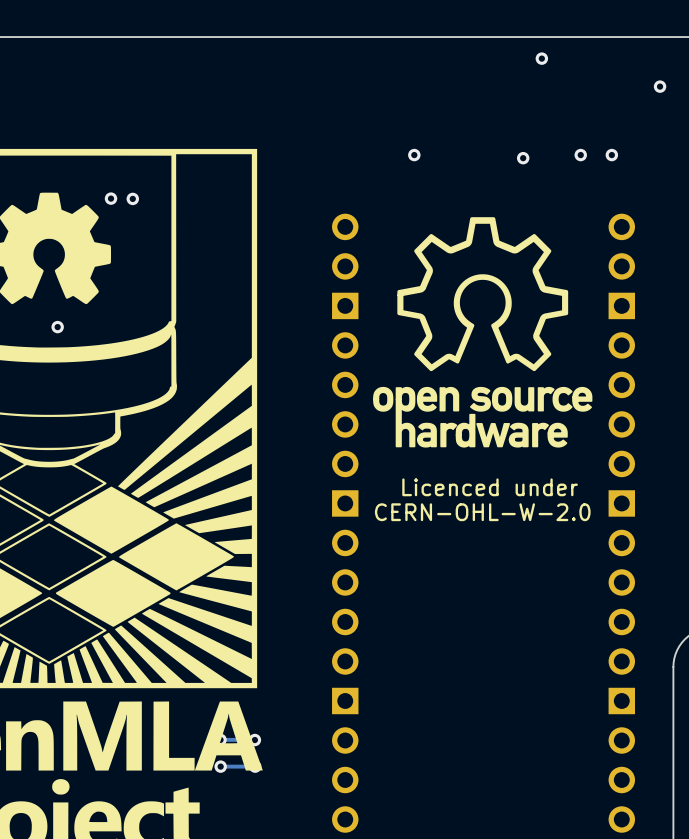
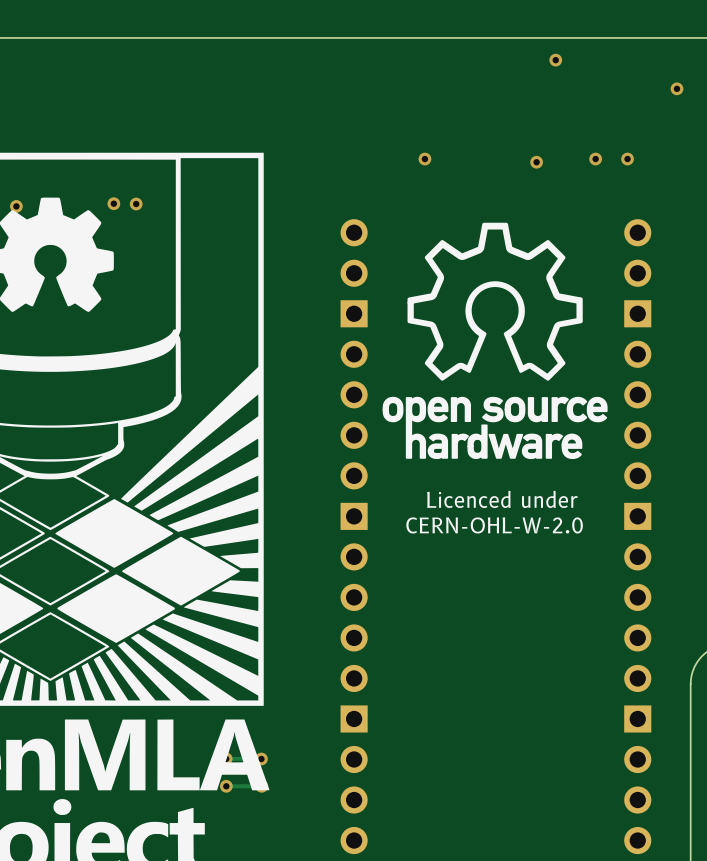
via: none -> (16, 206)
via: (57, 327) -> none

